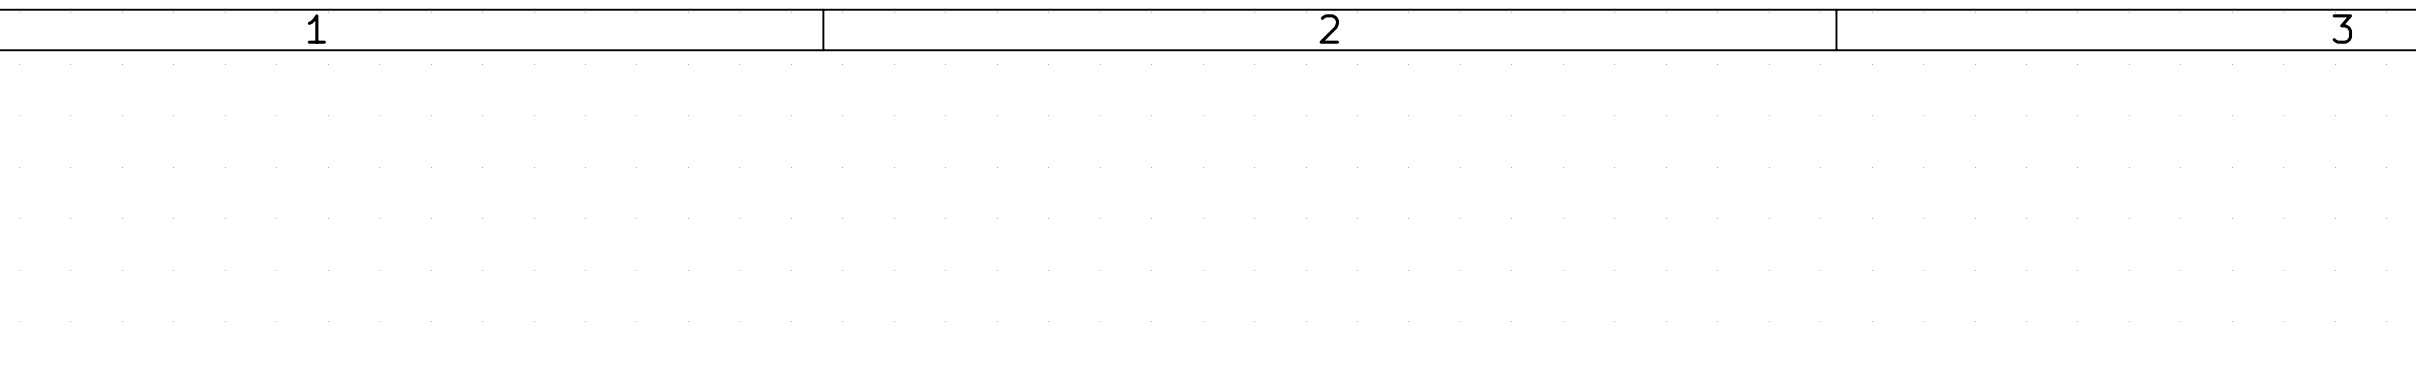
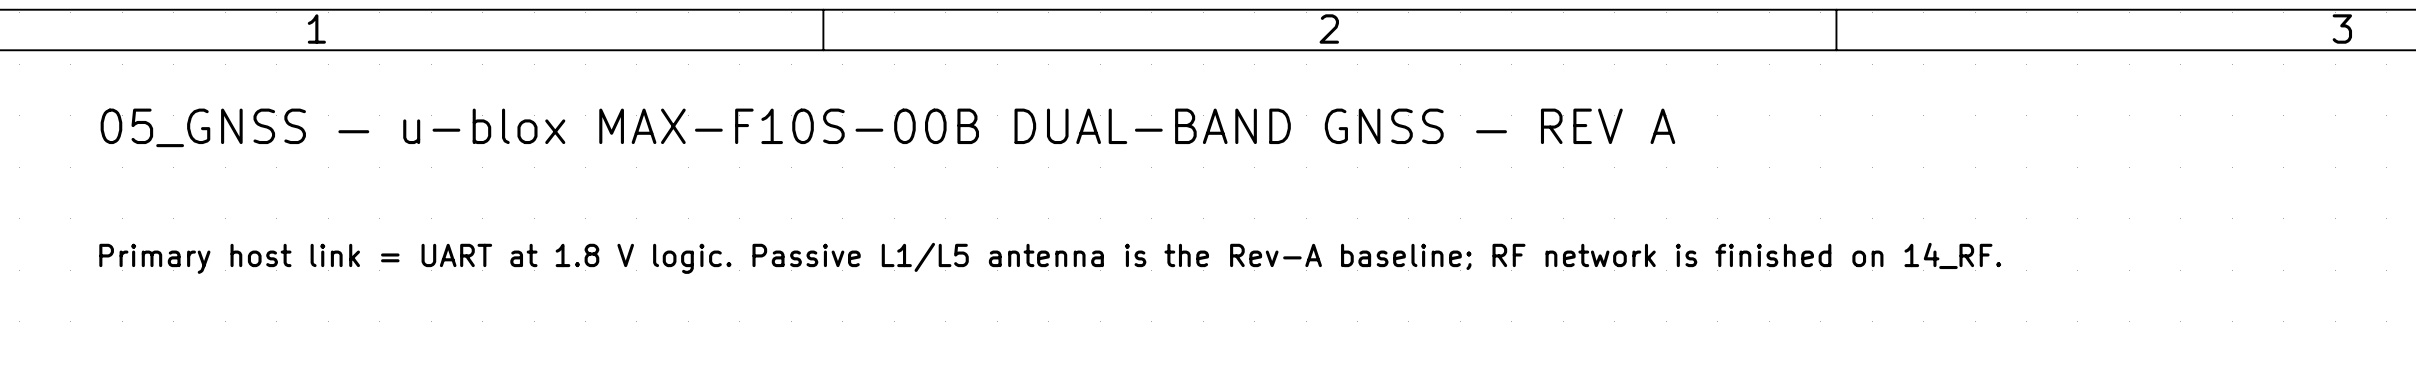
text: none -> 05_GNSS — u-blox MAX-F10S-00B DUAL-BAND GNSS — REV A (887, 127)
text: none -> Primary host link = UART at 1.8 V logic. Passive L1/L5 antenna is the Rev-A baseline; RF network is finished on 14_RF. (1050, 258)

